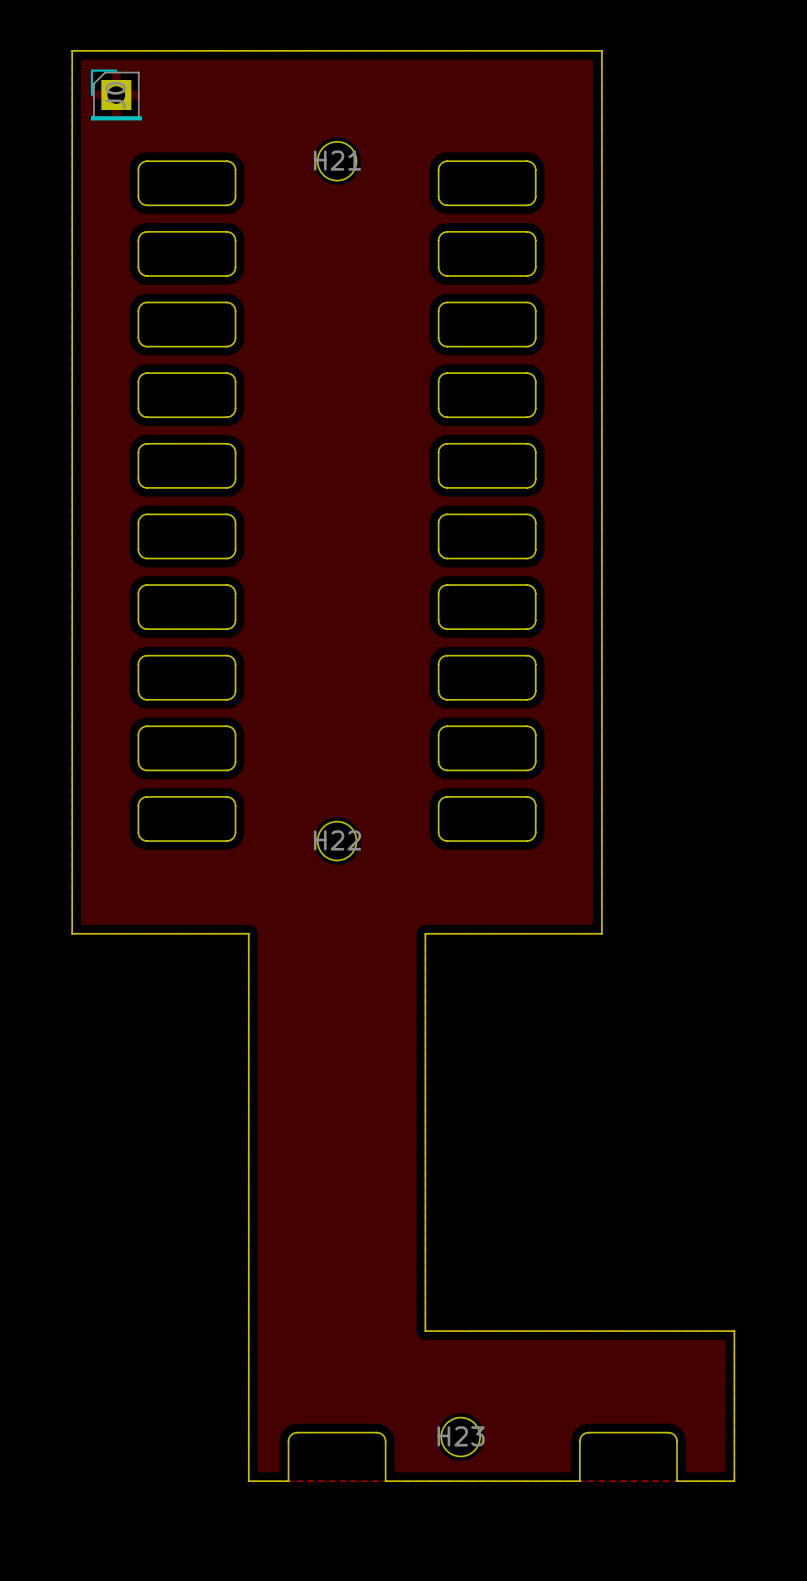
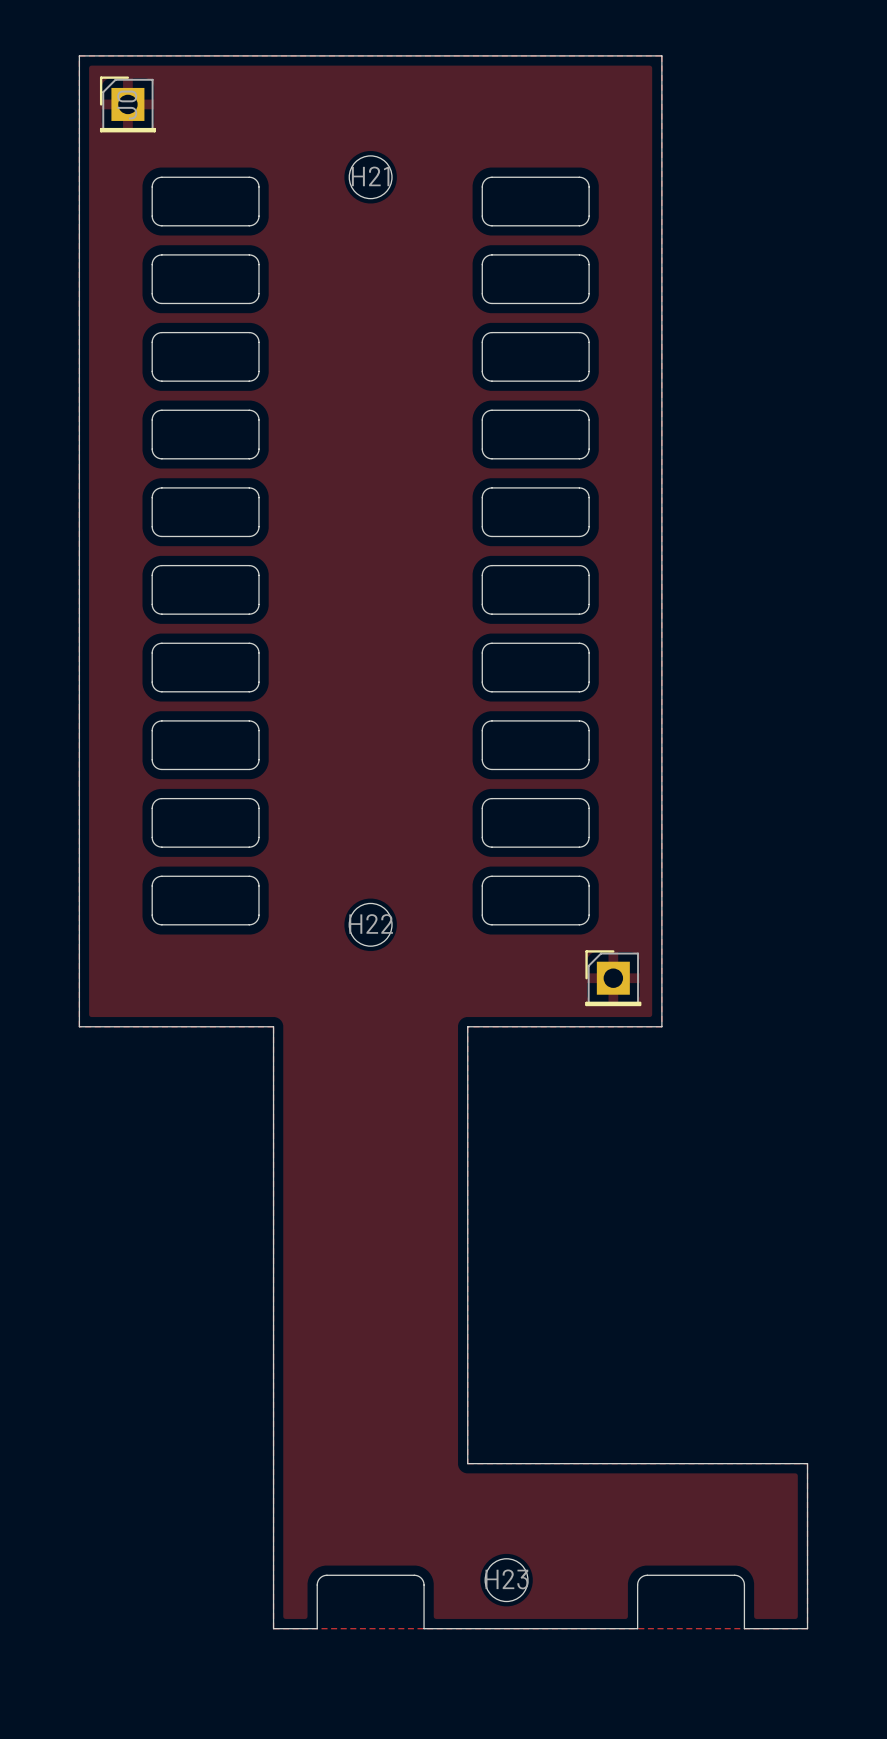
part: none -> (613, 978)

